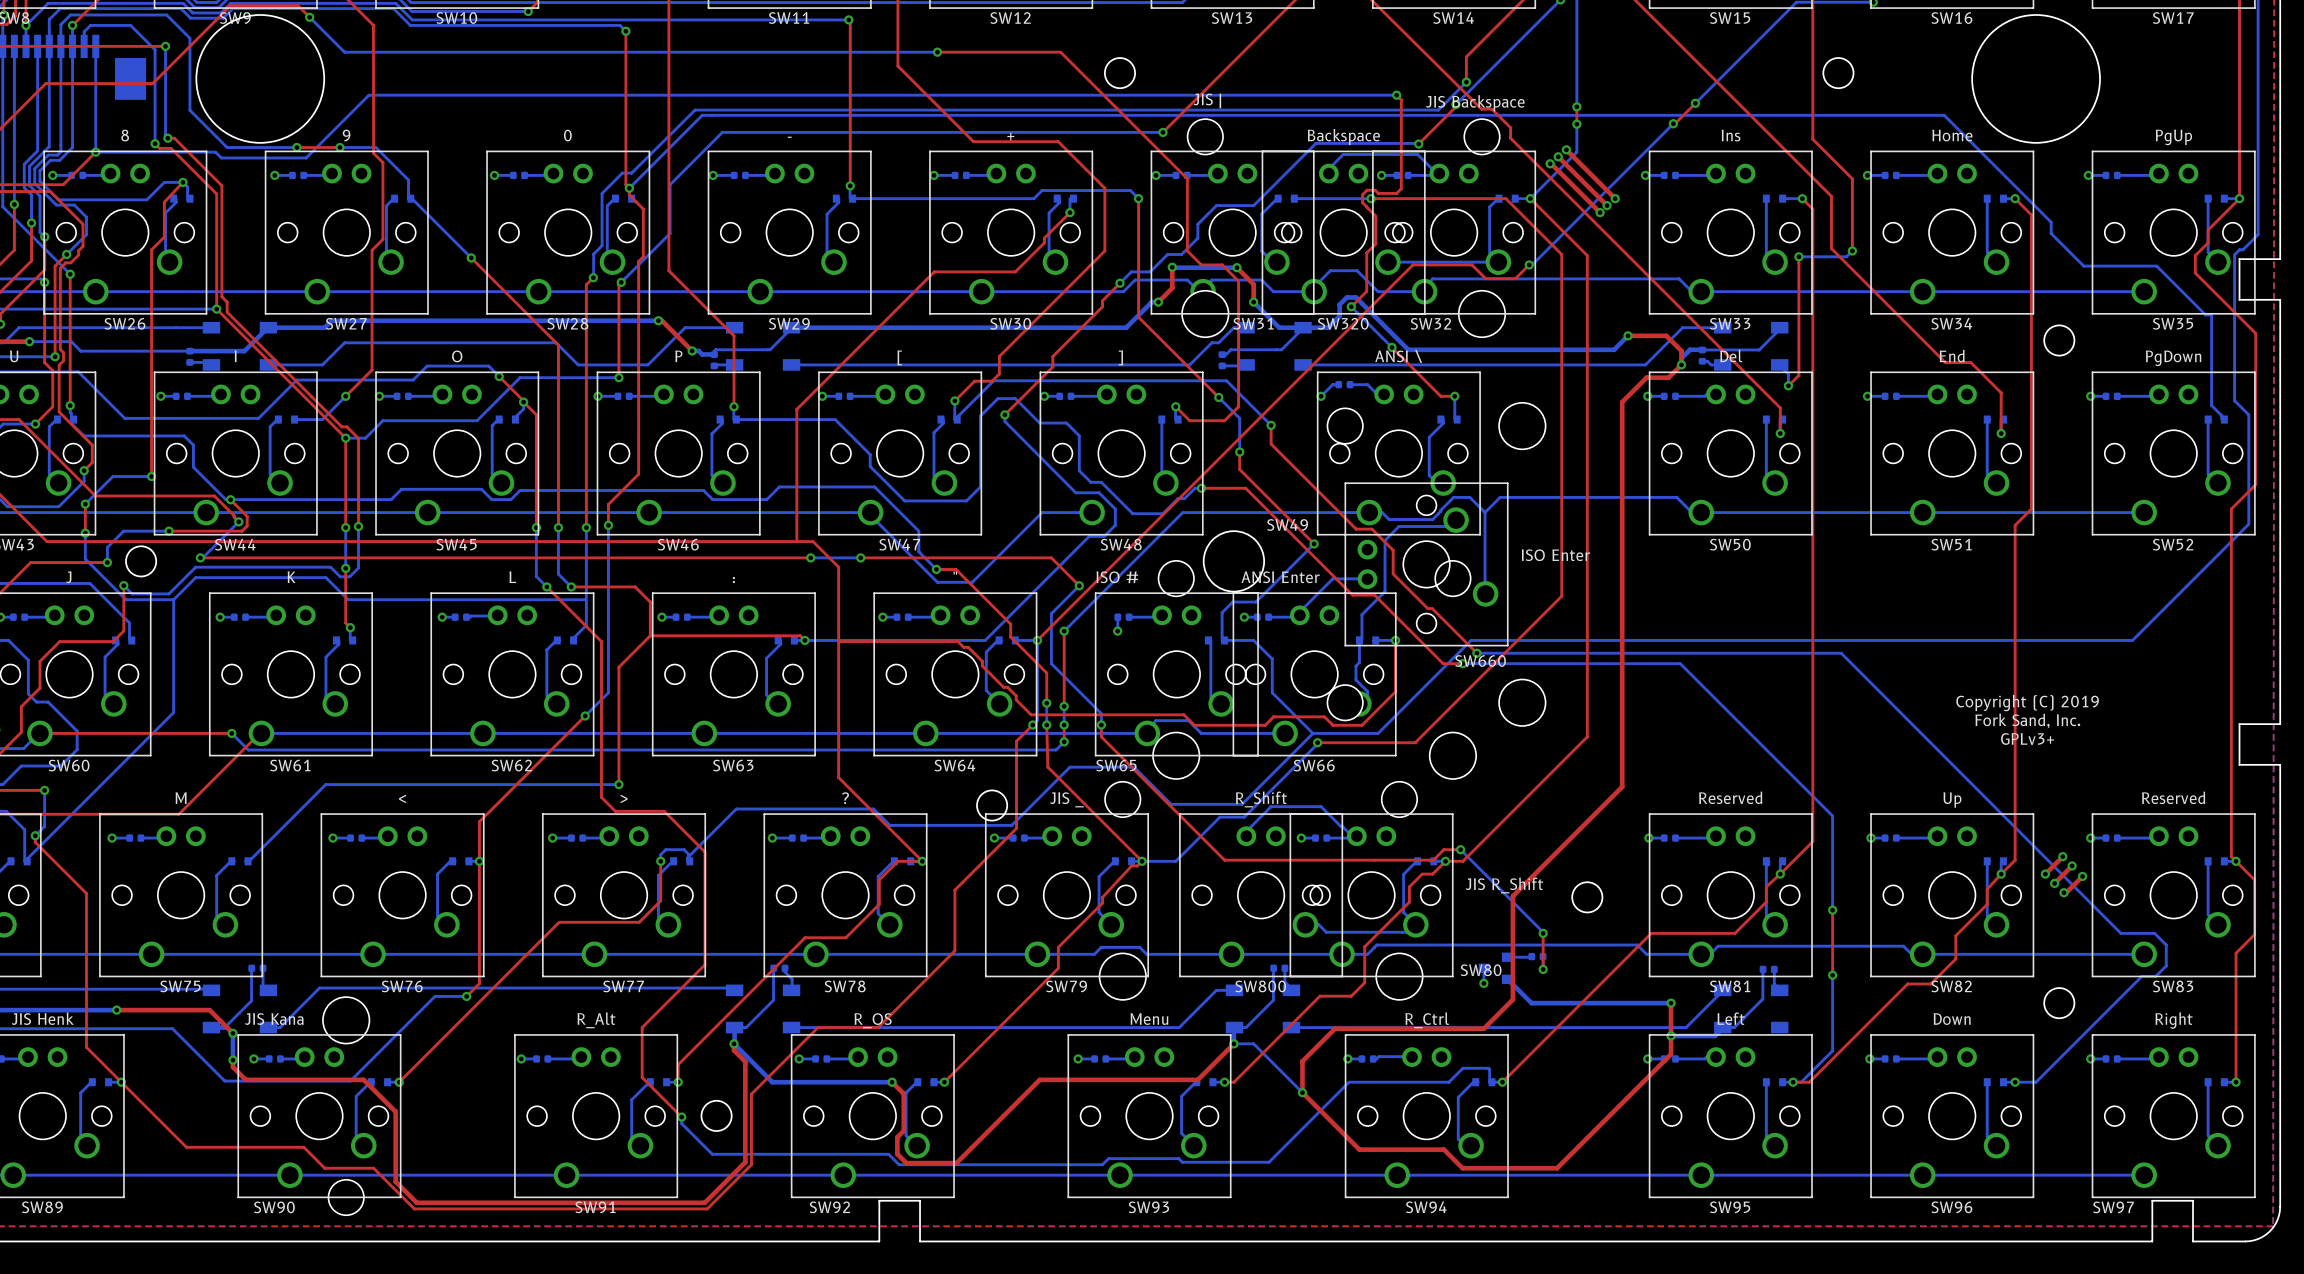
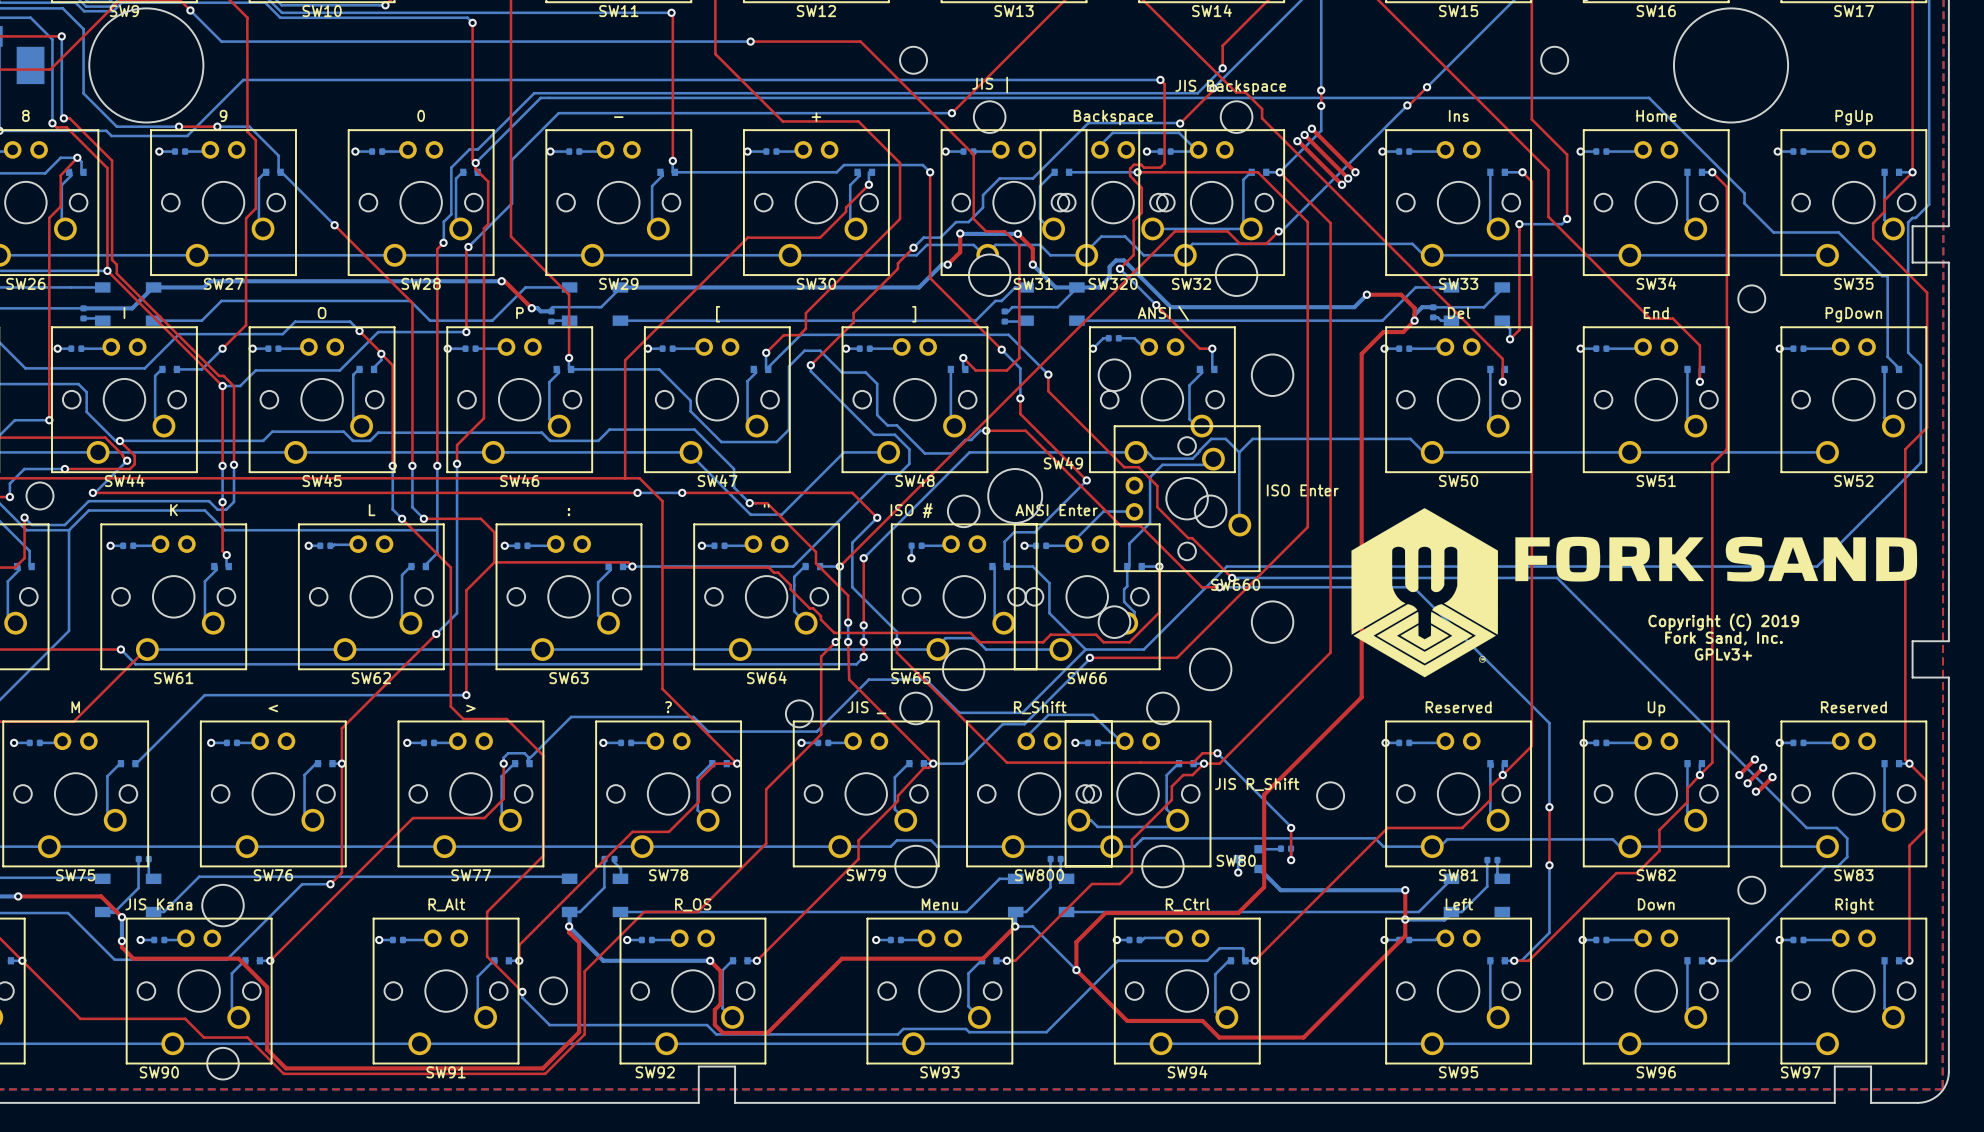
drawing: none -> [1351, 508, 1498, 678]
drawing: none -> [1515, 536, 1918, 582]

